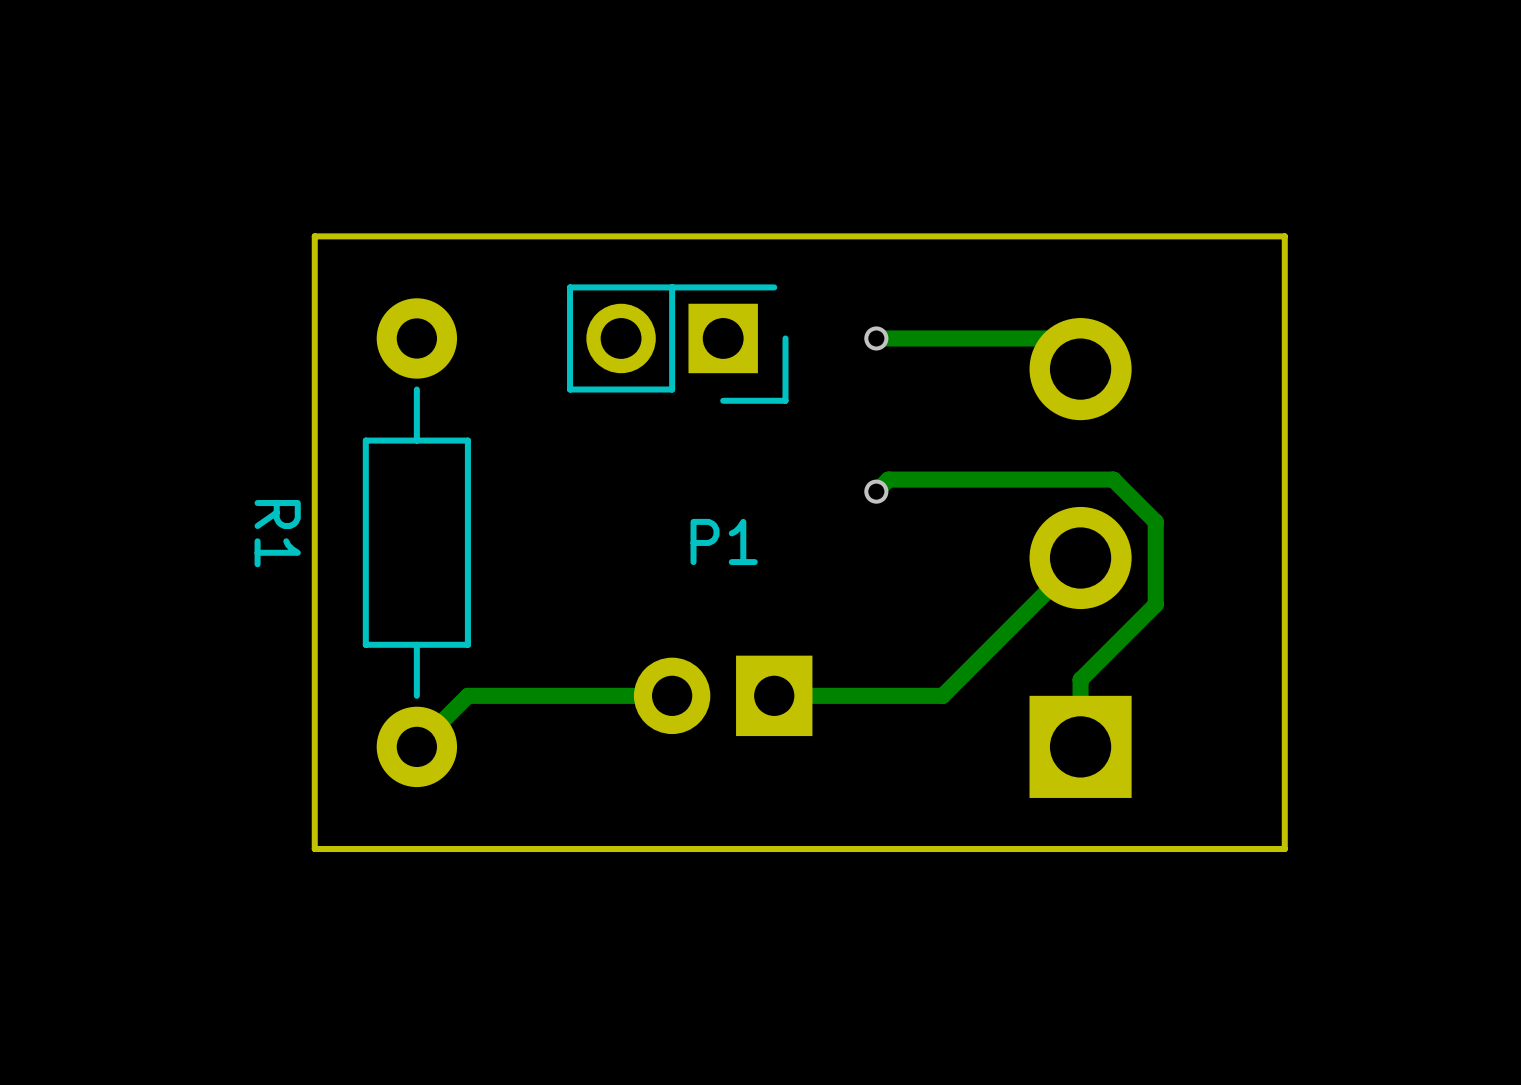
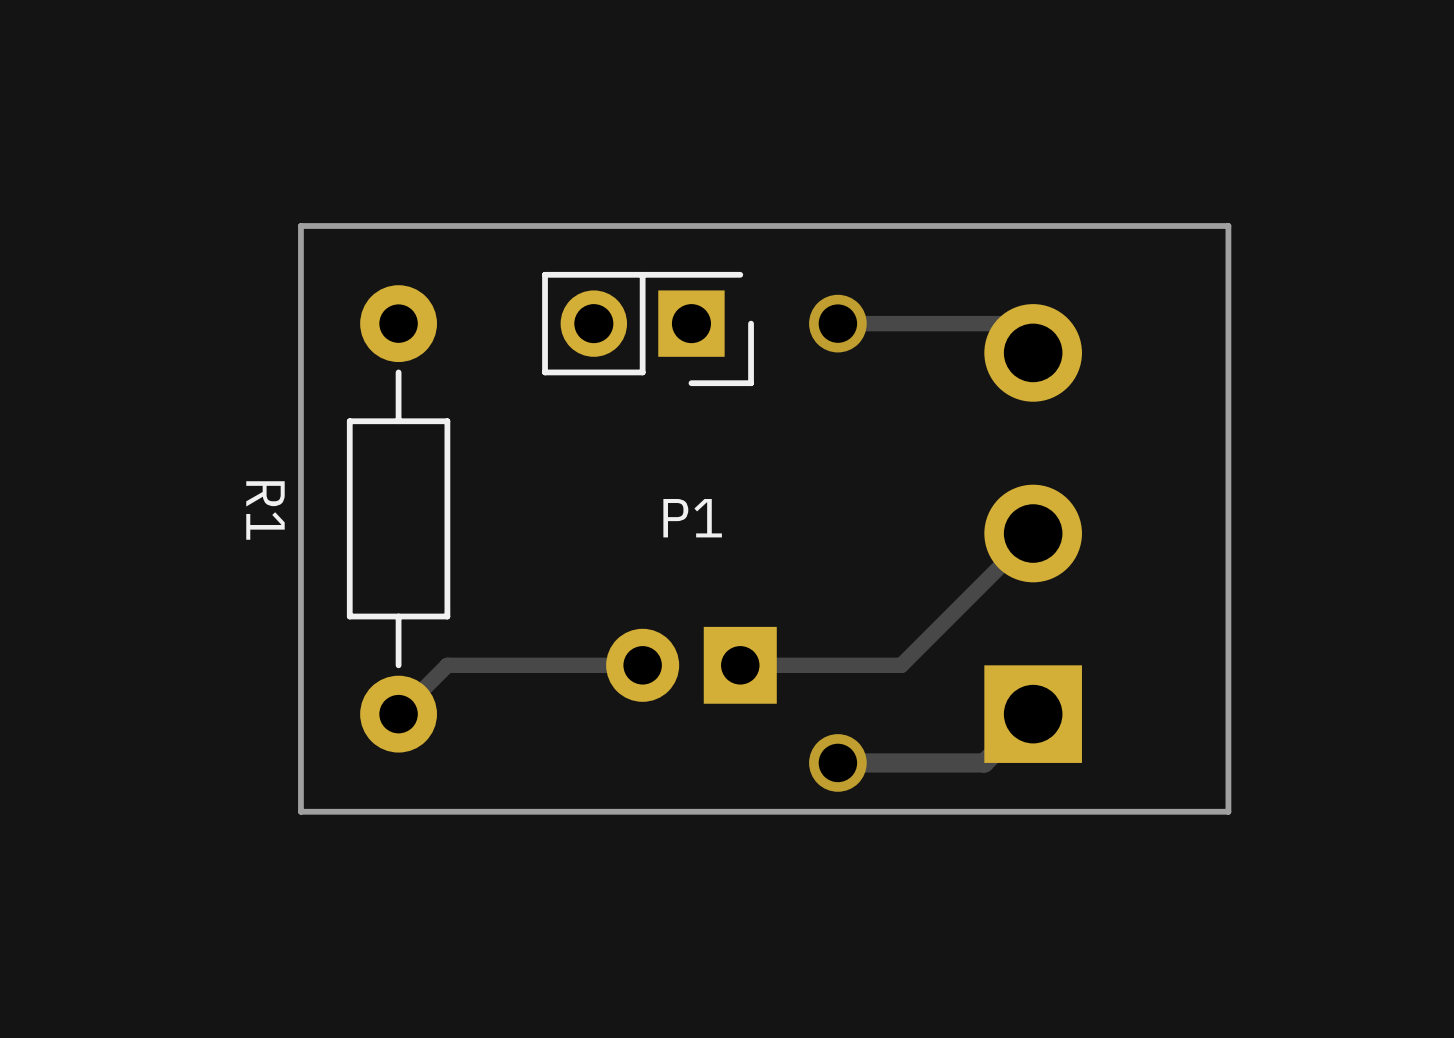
via size: [864, 326, 889, 351] -> [809, 294, 867, 353]
track: (876, 491) (888, 479) (1113, 479) (1155, 521) (1155, 604) (1080, 679) (1080, 746) -> (837, 762) (984, 762) (1033, 714)
via: (876, 491) -> none
via: none -> (837, 762)

